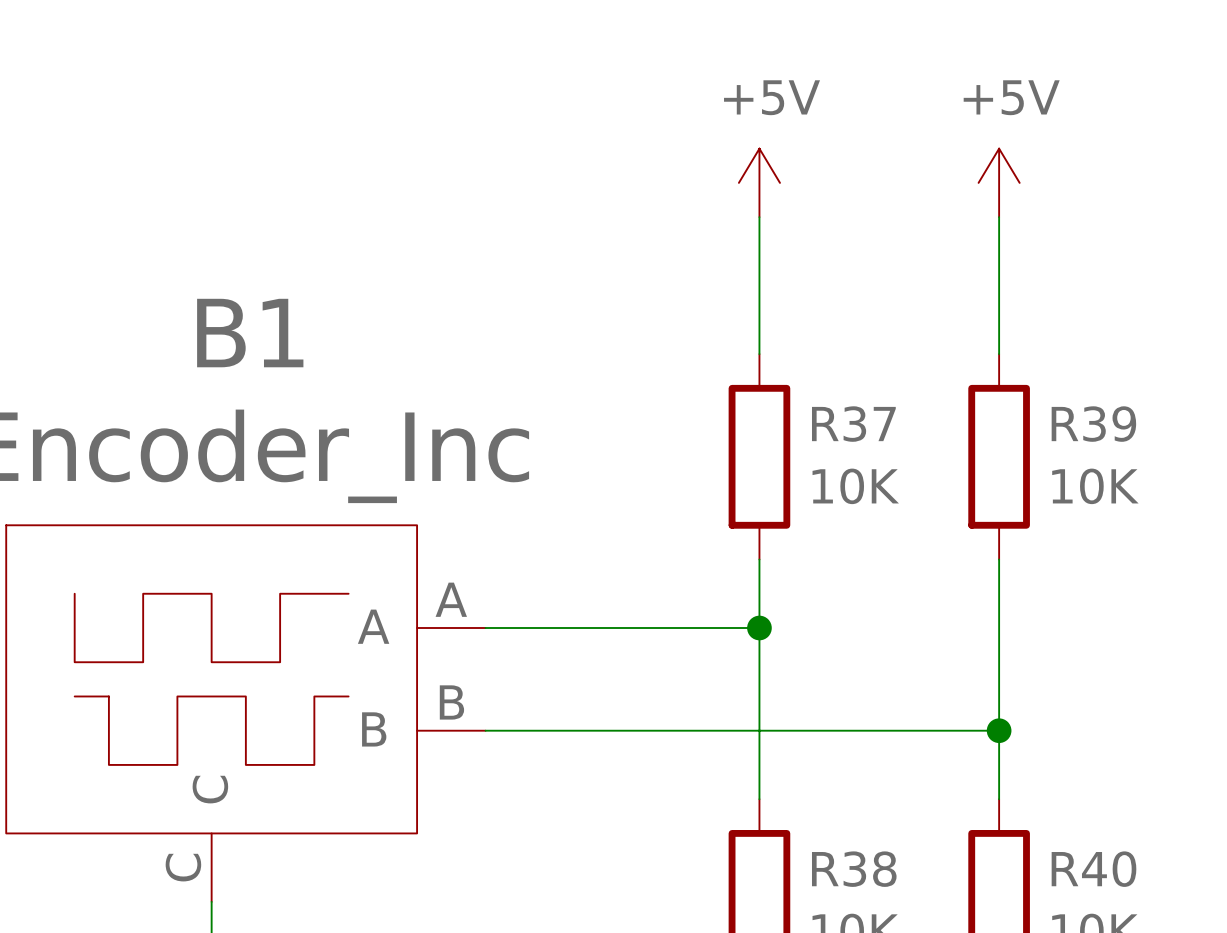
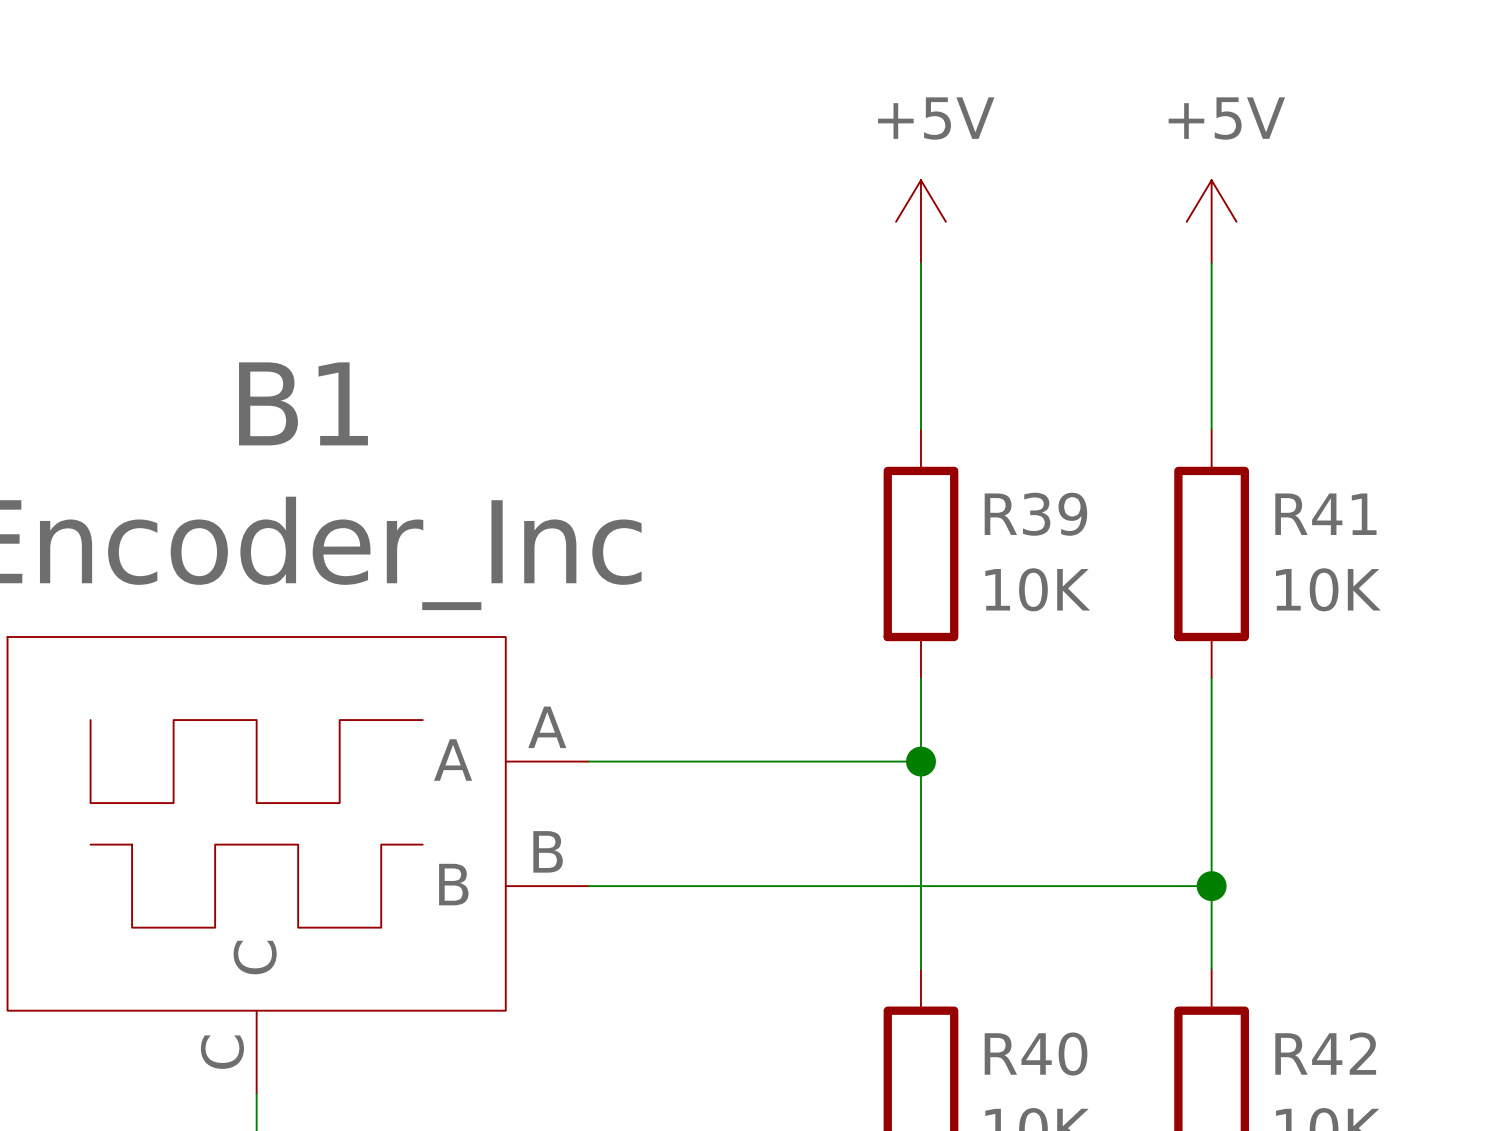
R37 name: R37 (853, 424) -> R39 (1035, 514)
R39 name: R39 (1093, 424) -> R41 (1325, 514)
R38 name: R38 (854, 869) -> R40 (1036, 1054)
R40 name: R40 (1093, 869) -> R42 (1325, 1053)

